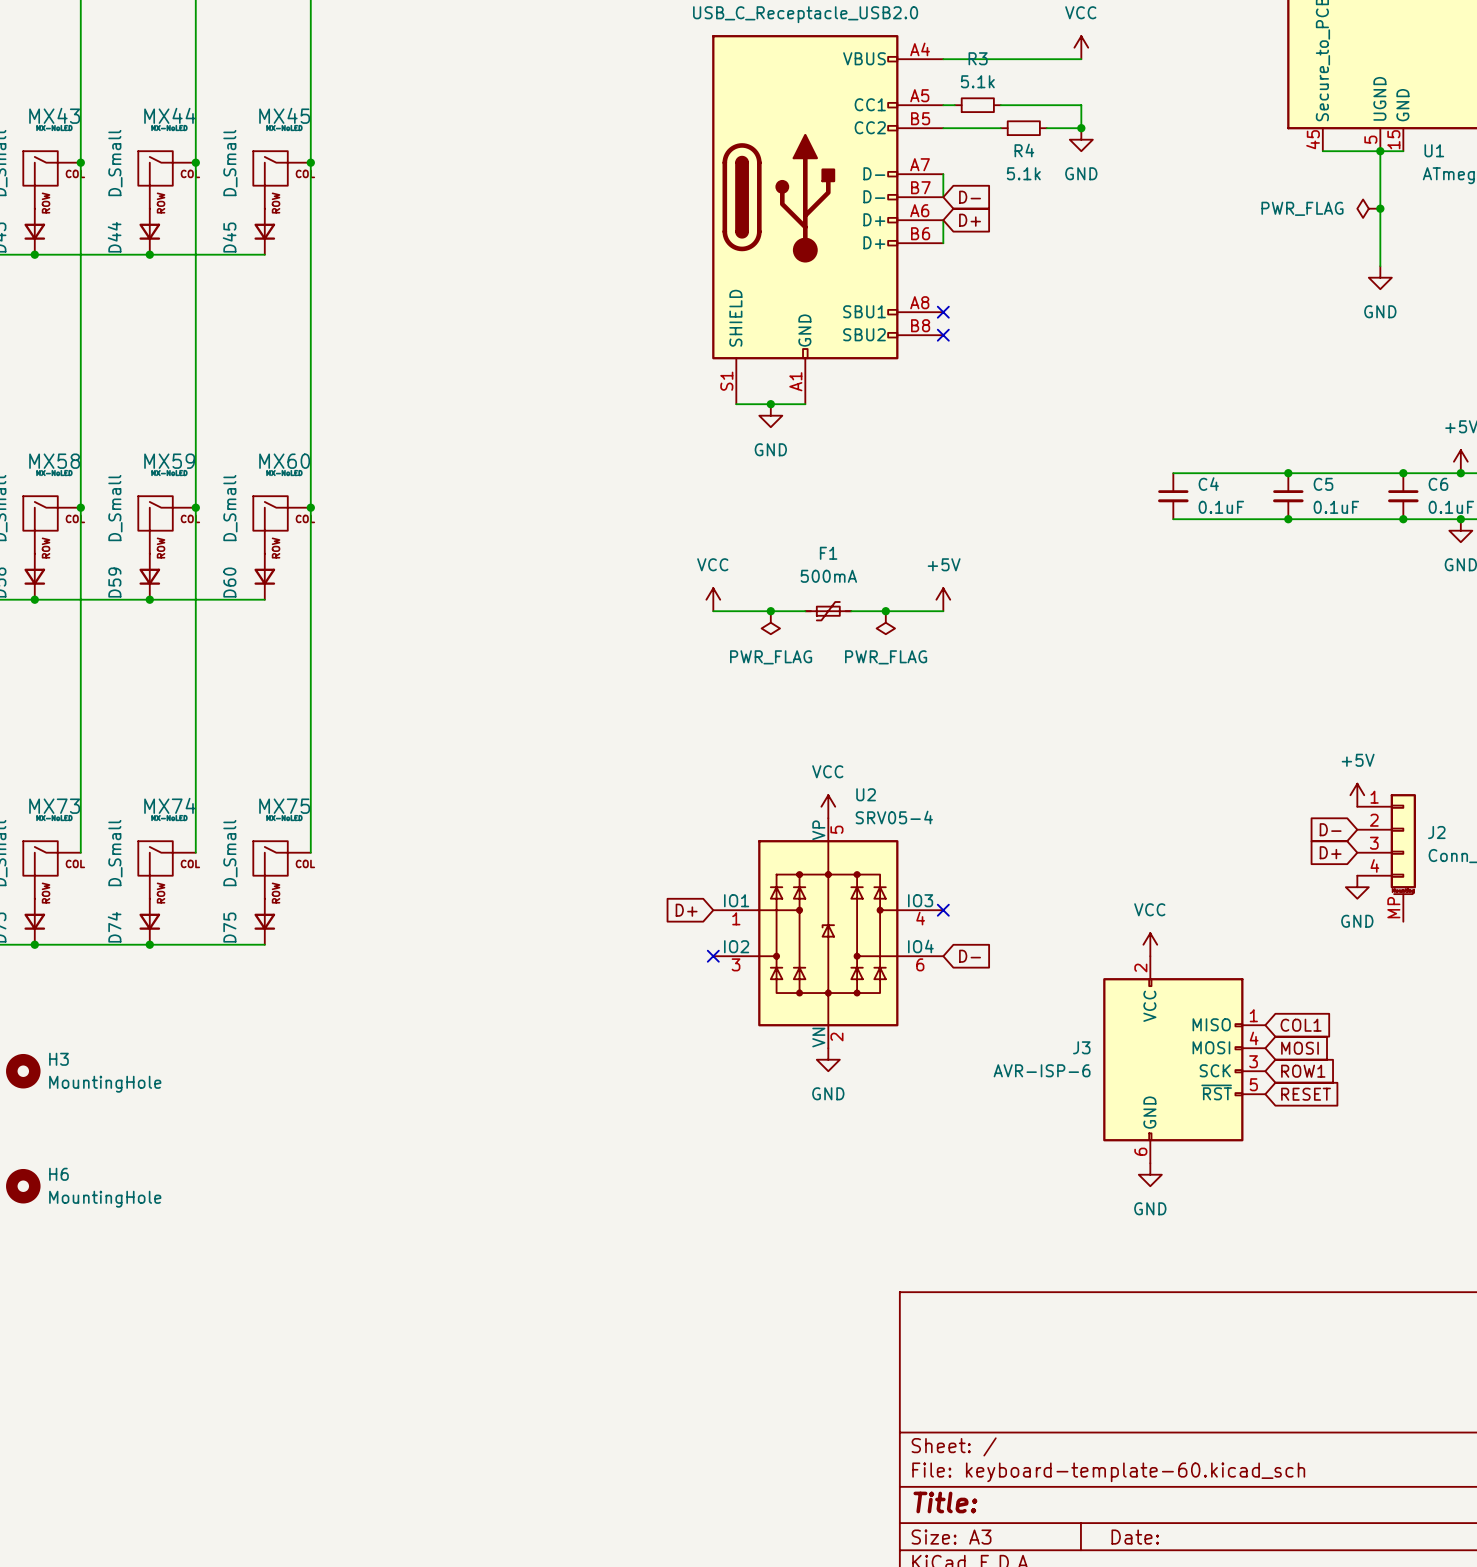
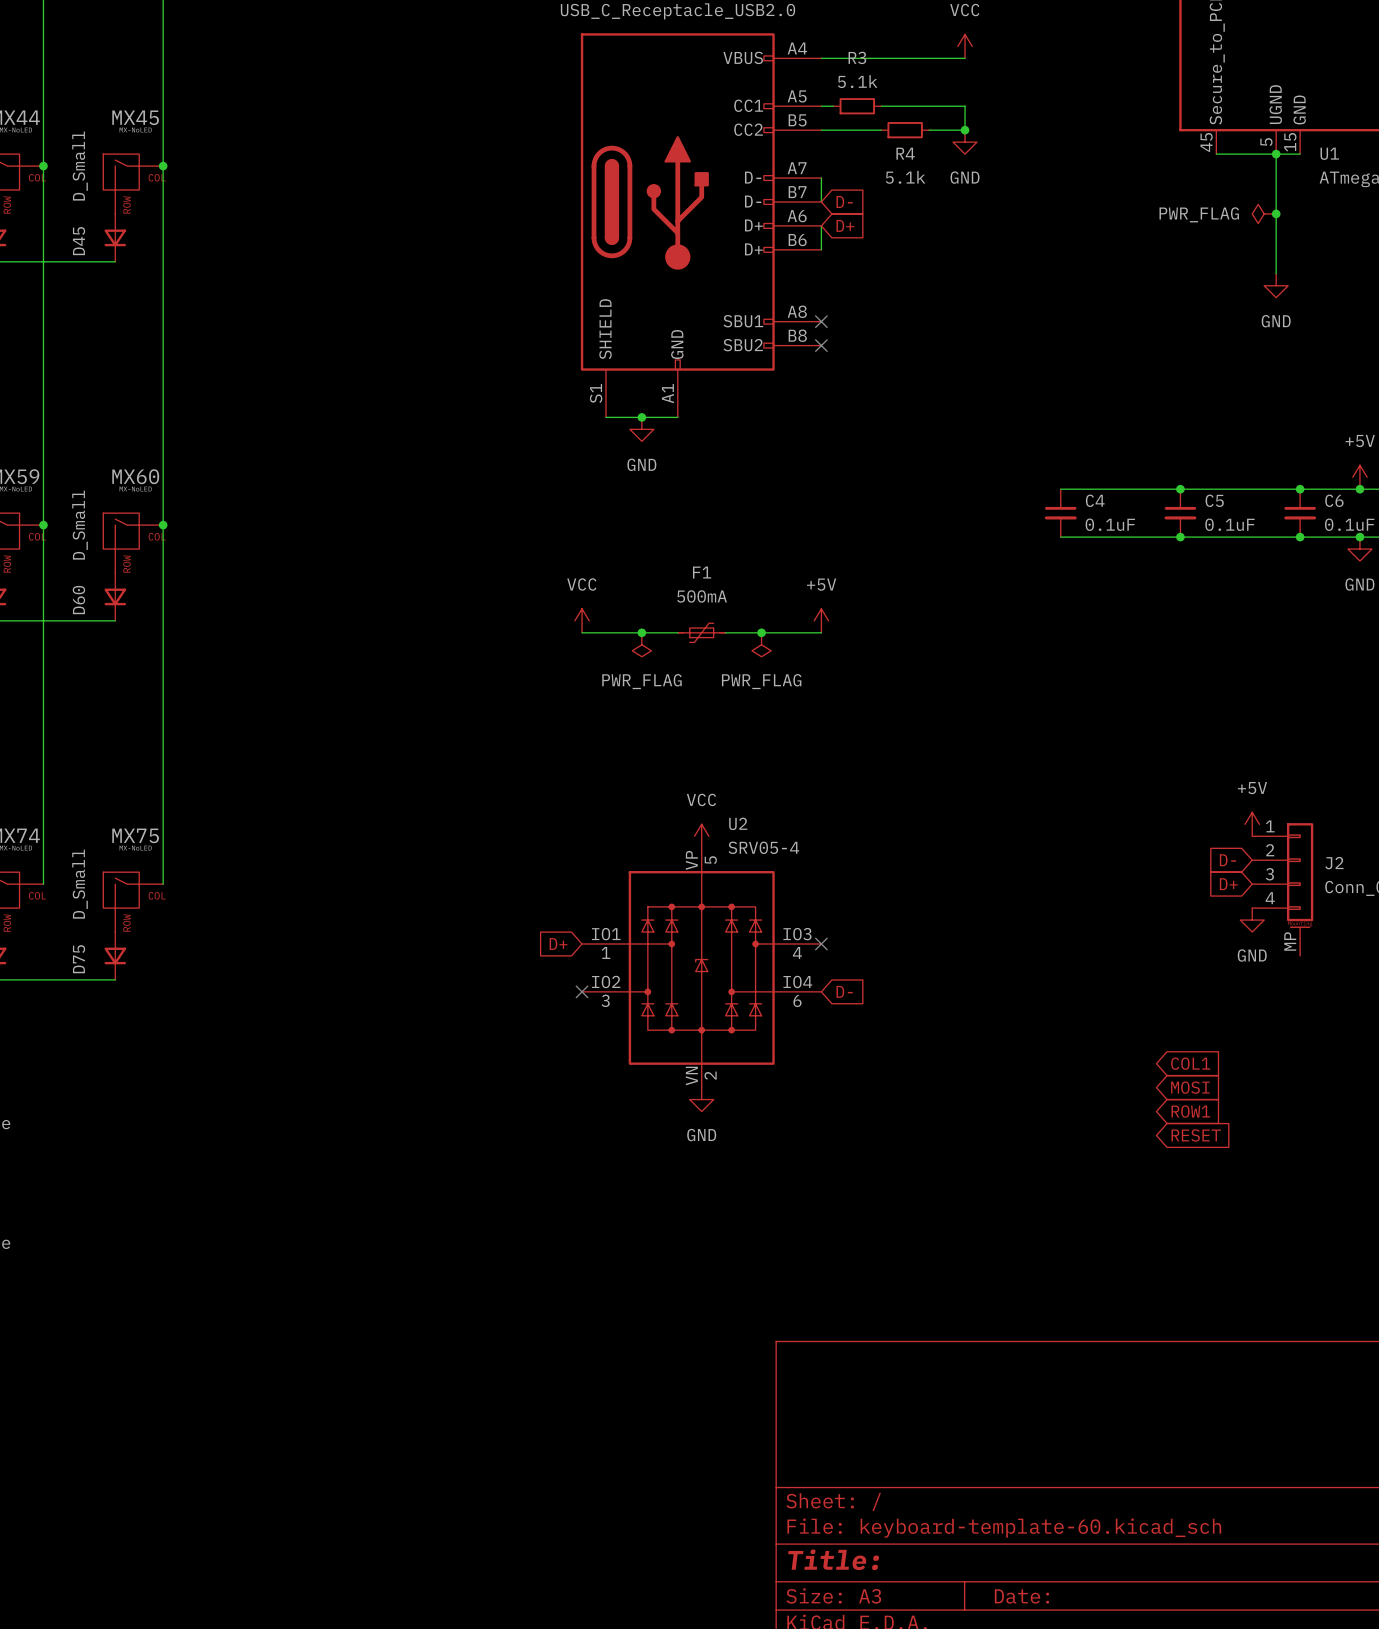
power symbol: VCC (1150, 944) -> none
J3: AVR-ISP-6 (1184, 1059) -> none
power symbol: GND (1150, 1174) -> none

